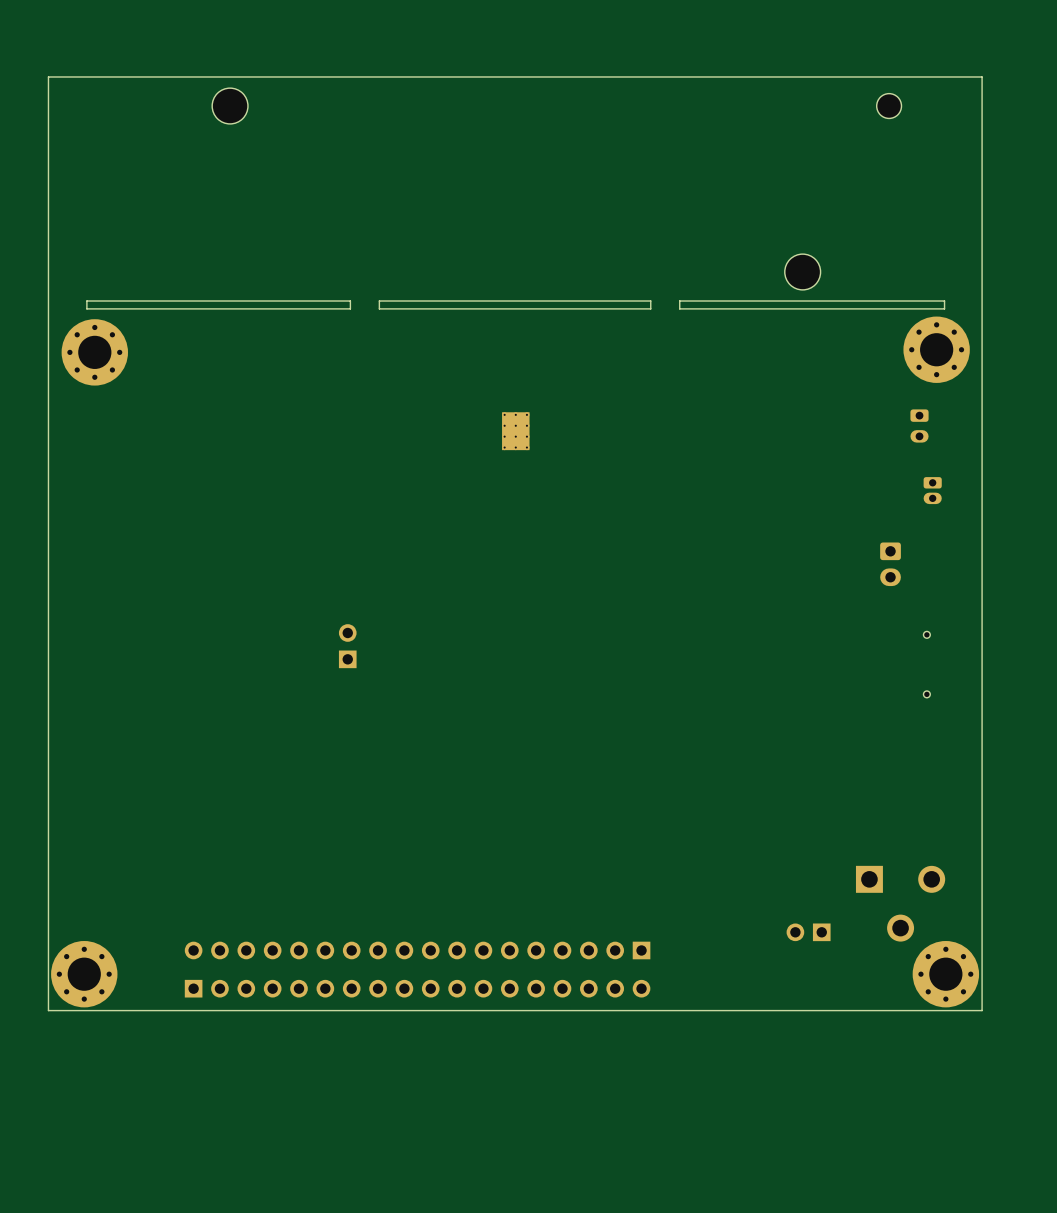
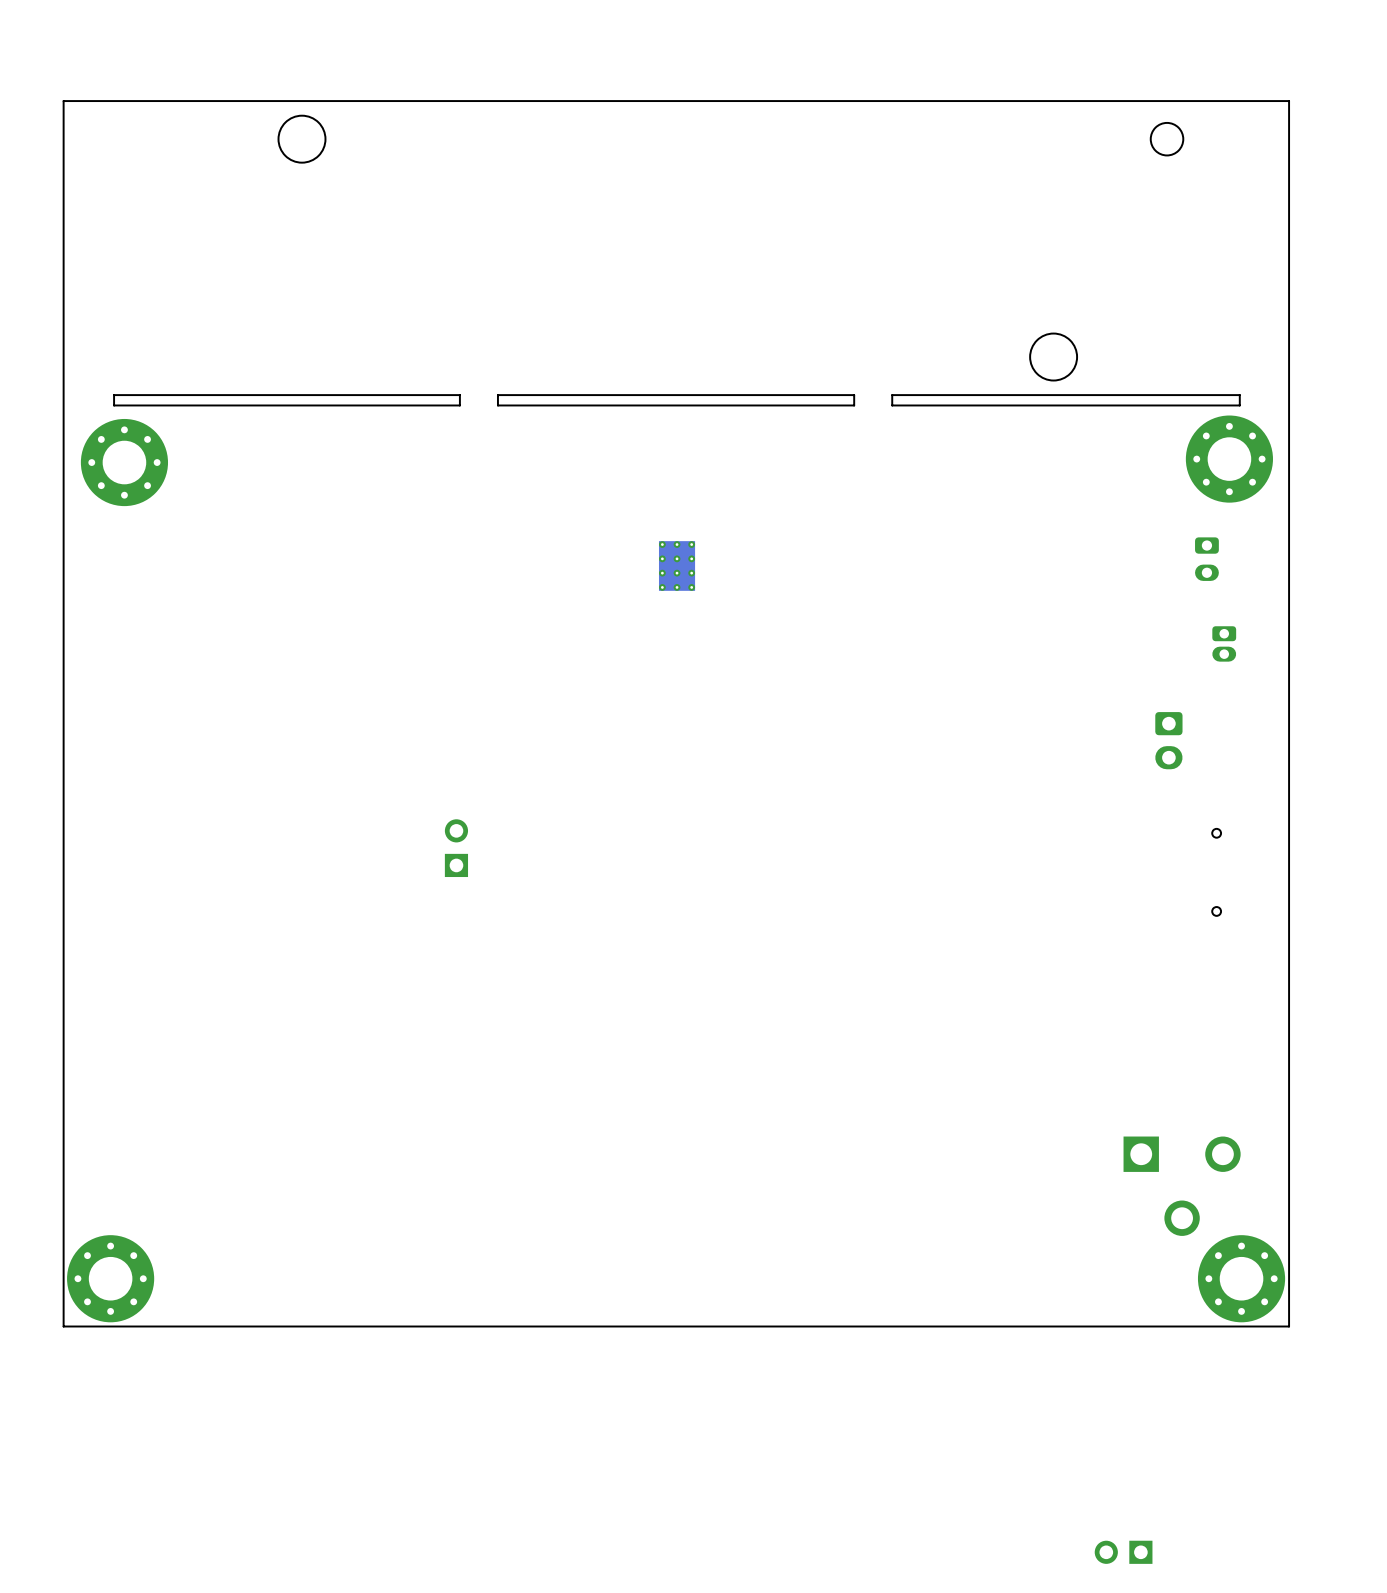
part position: (808, 932) -> (1123, 1552)
part: (417, 950) -> none
part: (417, 988) -> none

